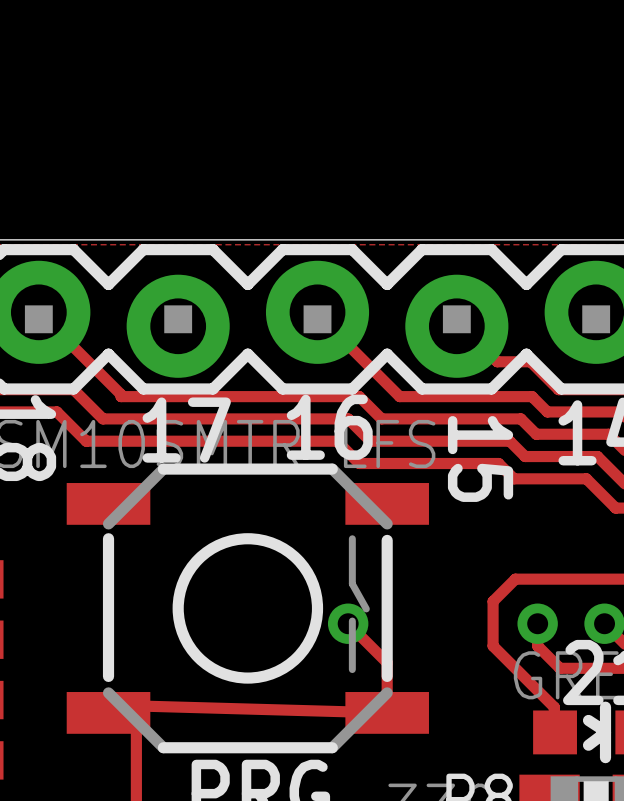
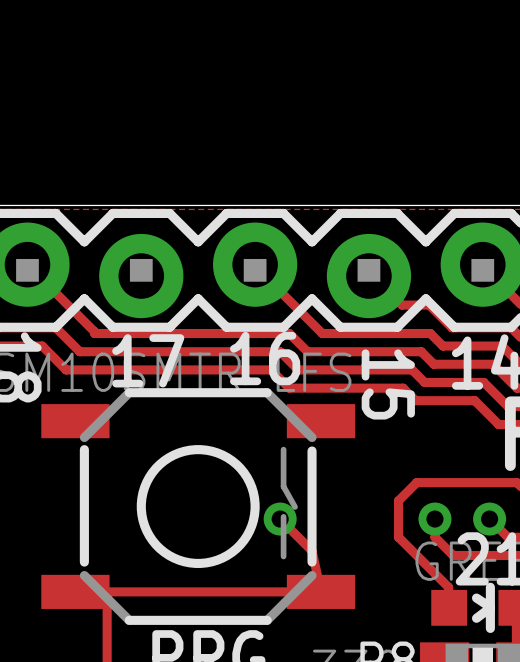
part footprint: [66, 463, 429, 754] -> [41, 388, 356, 625]
track: (387, 662) (387, 712) (136, 705) -> (312, 550) (321, 591) (75, 591)

